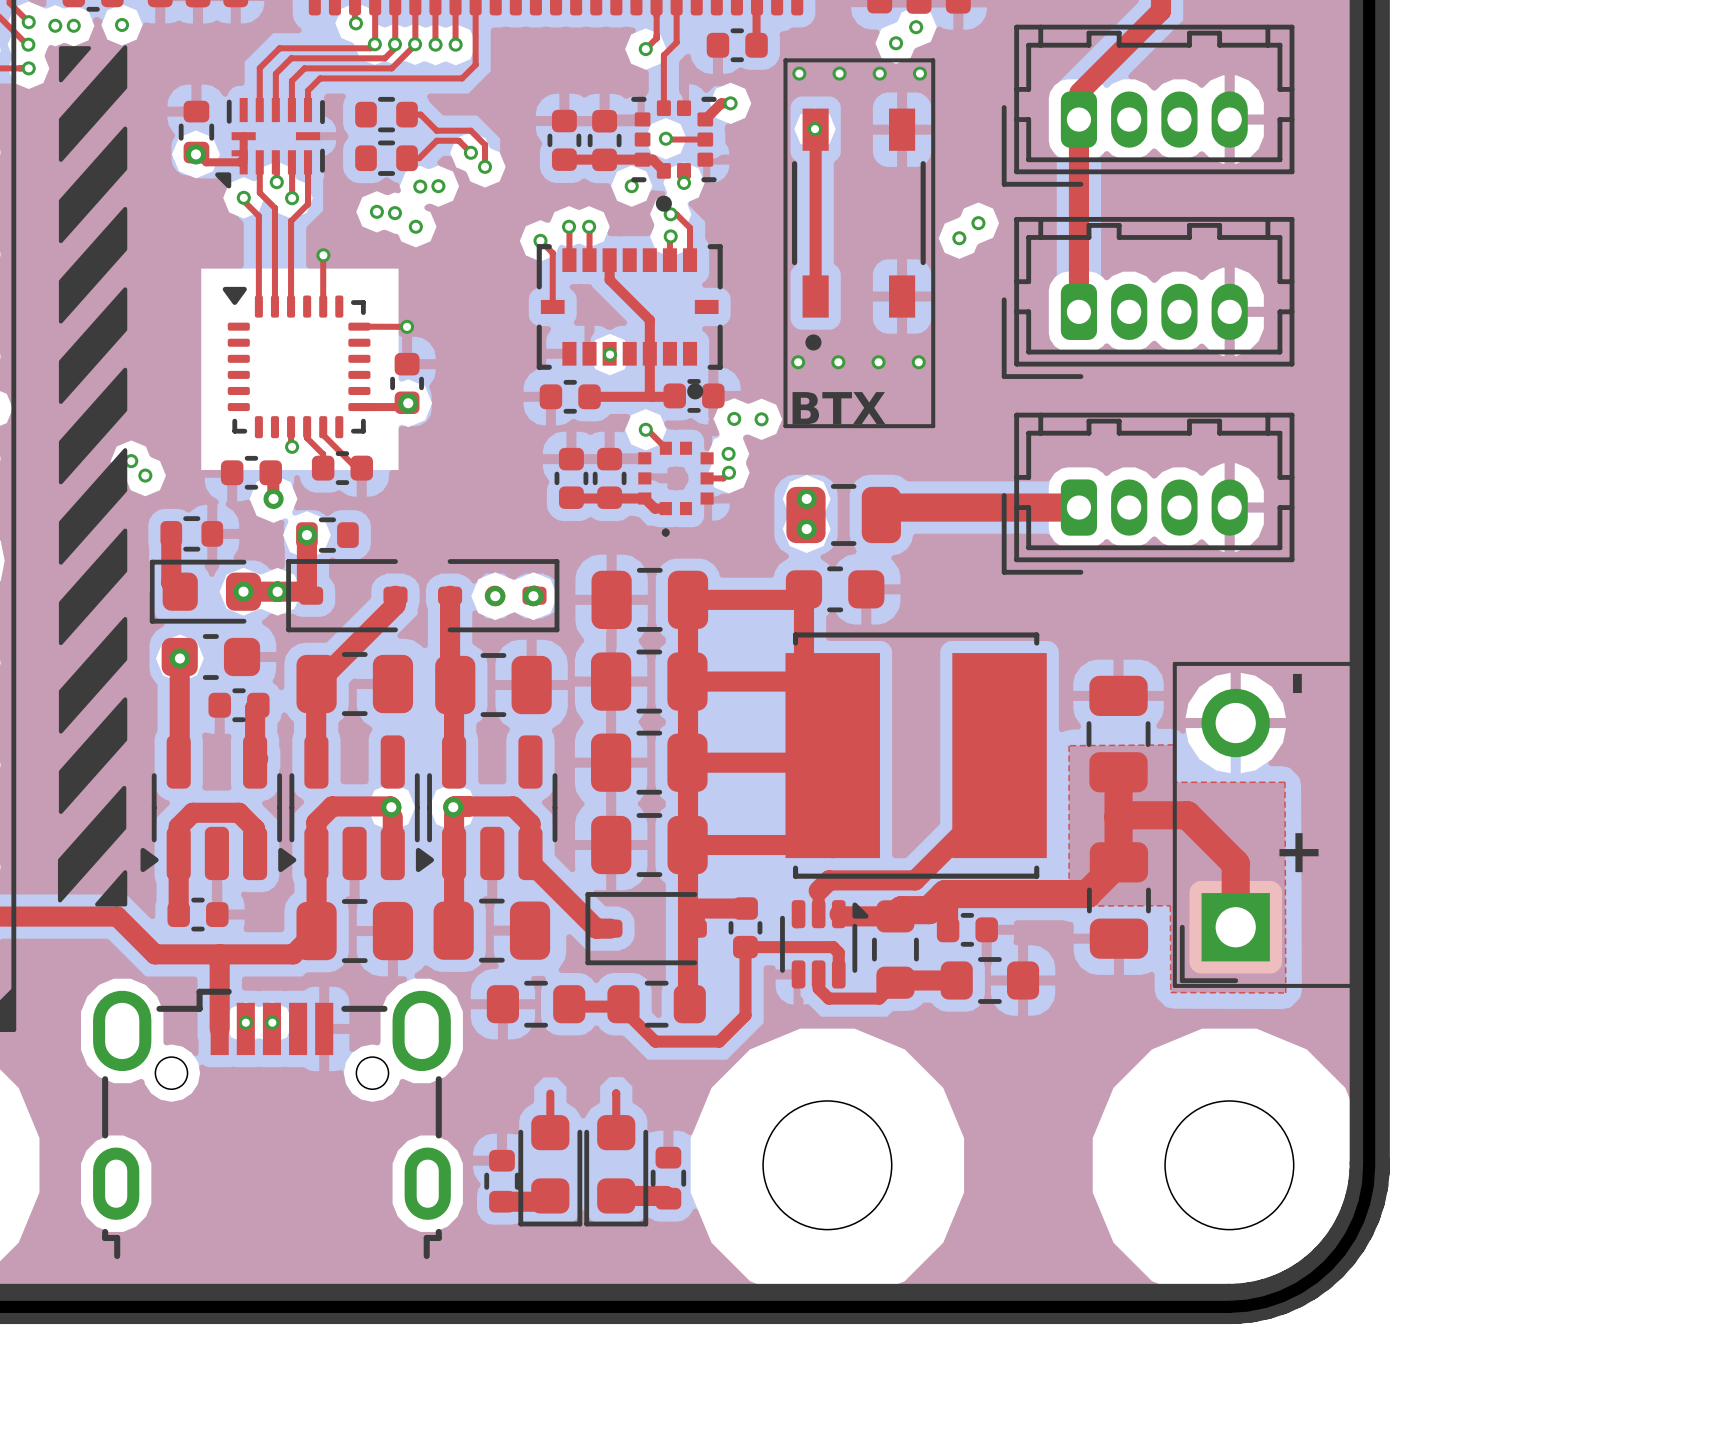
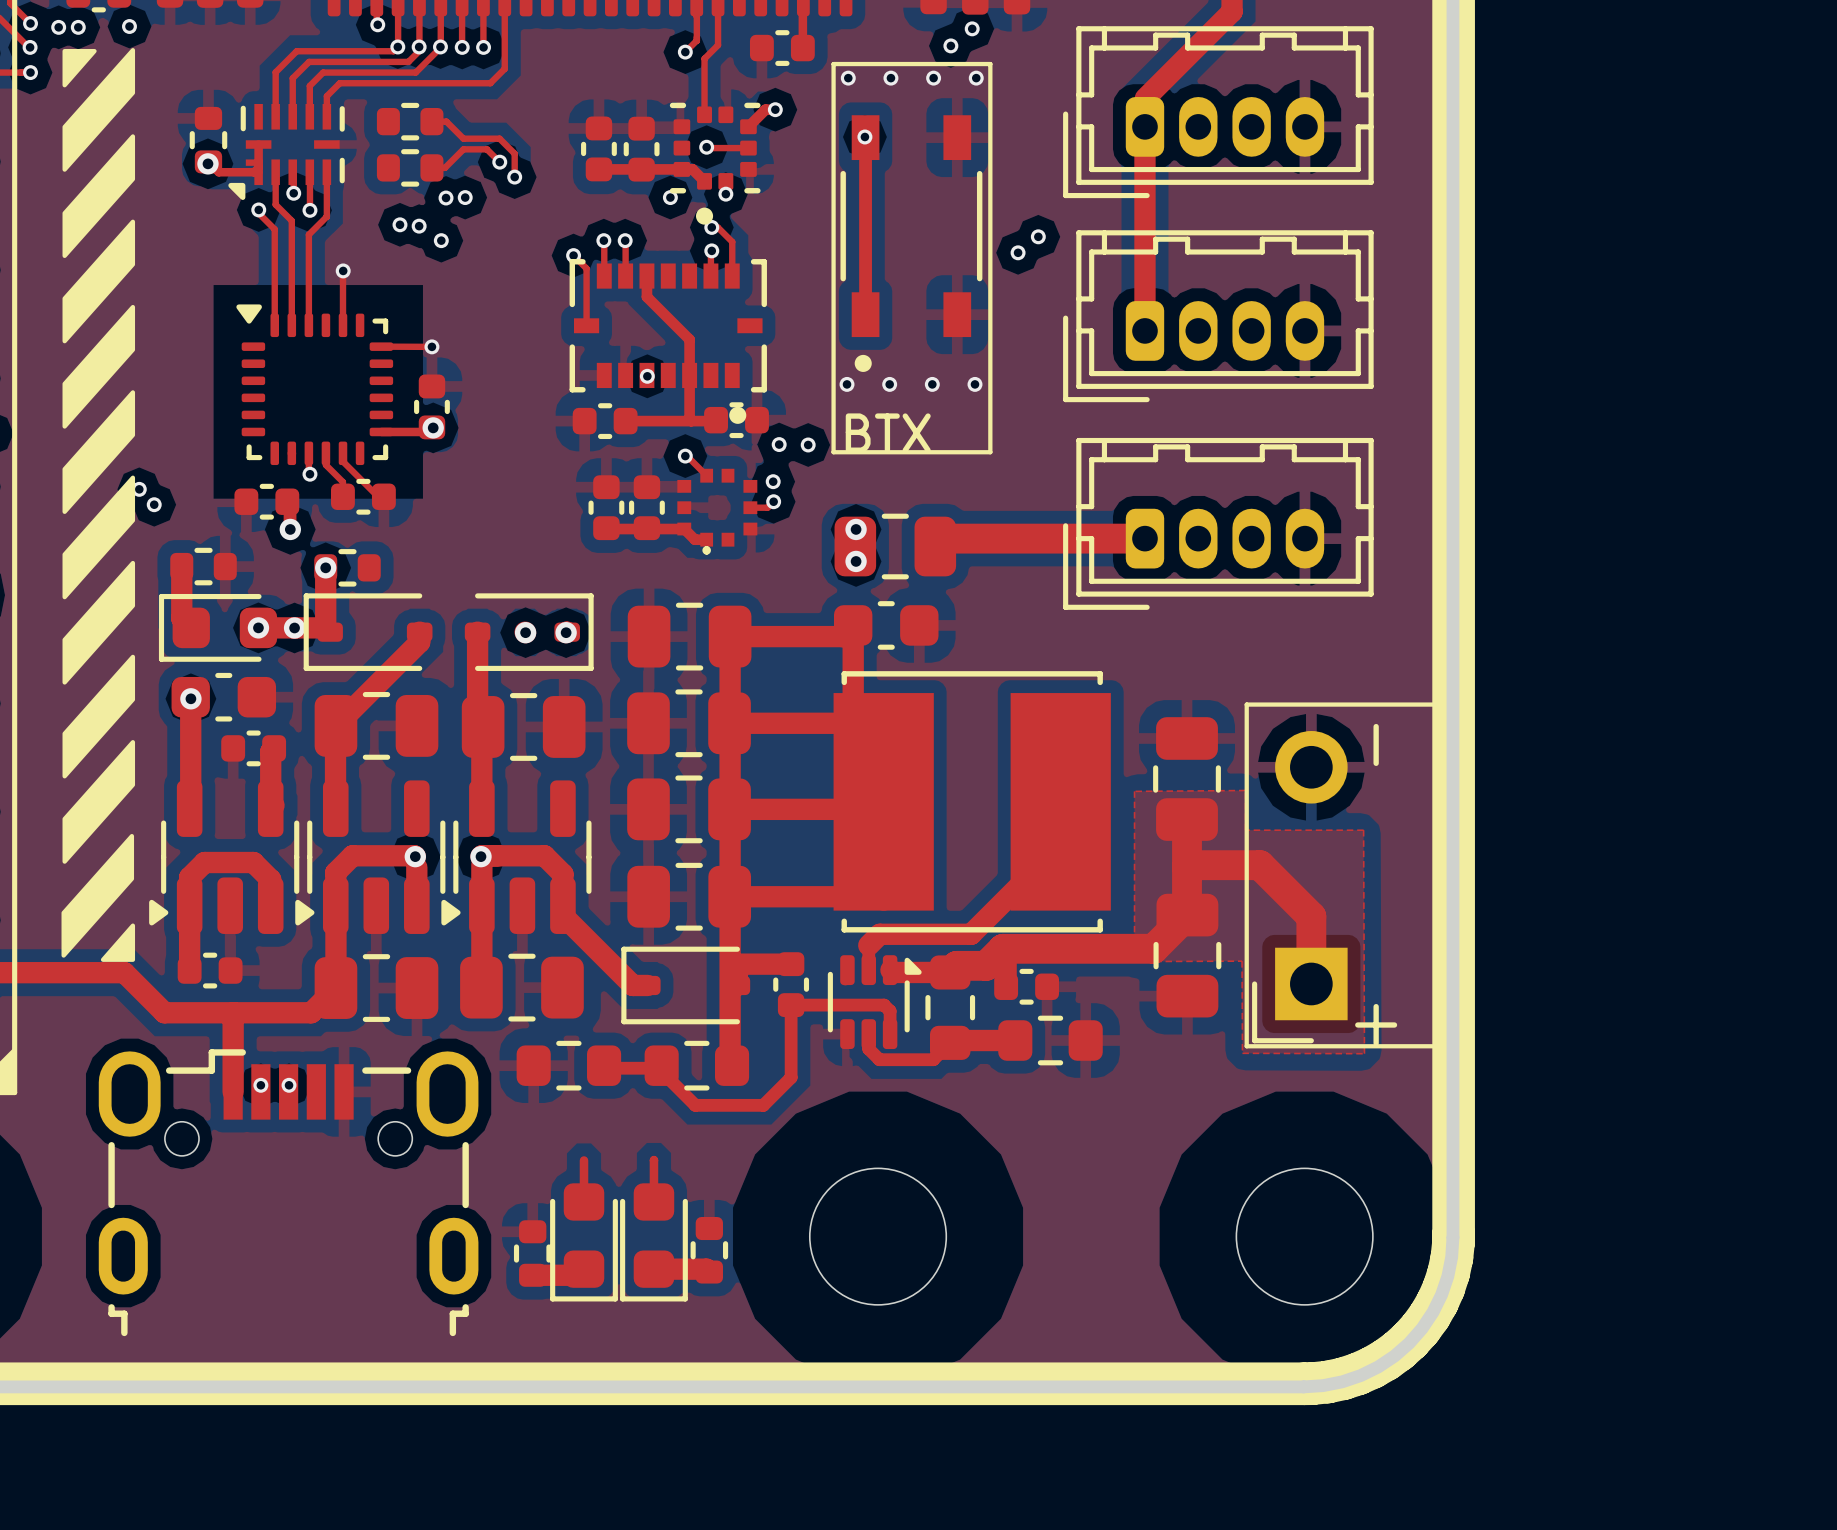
part footprint: [638, 441, 714, 537] -> [677, 468, 758, 555]

